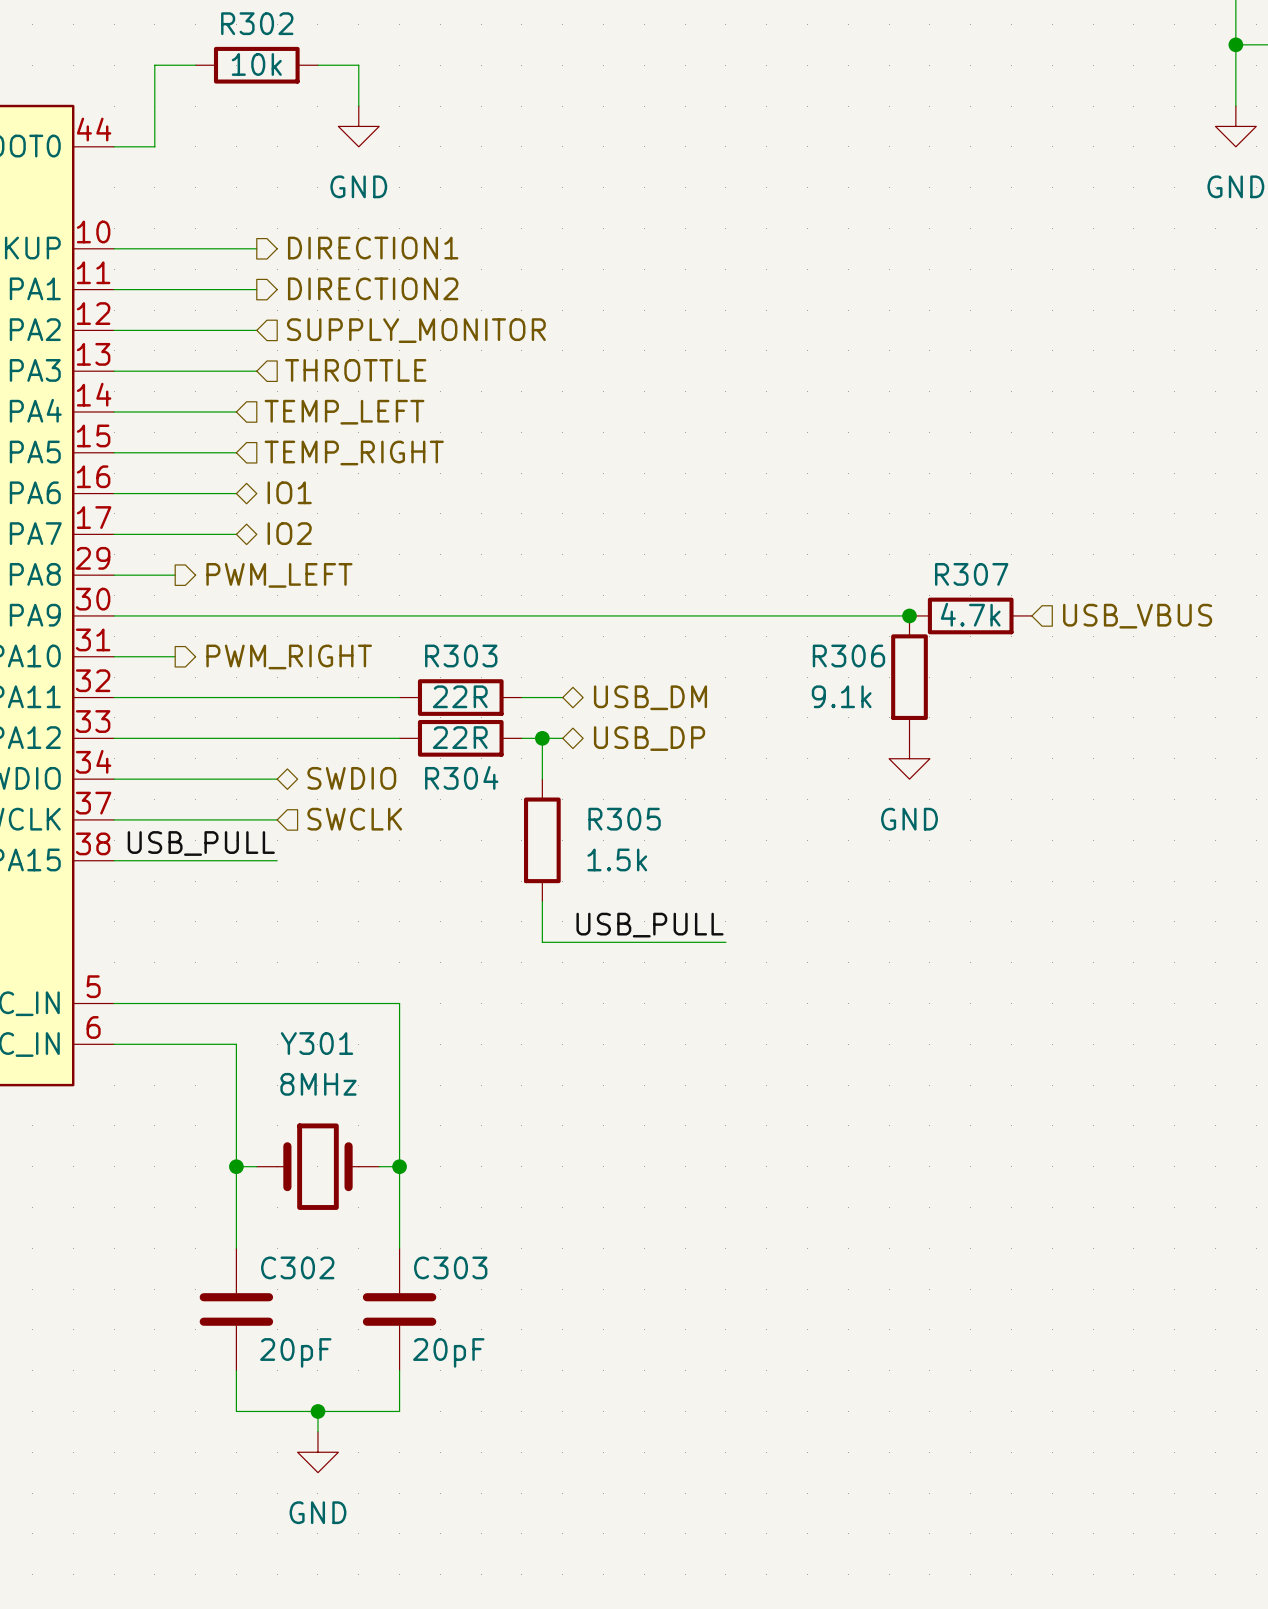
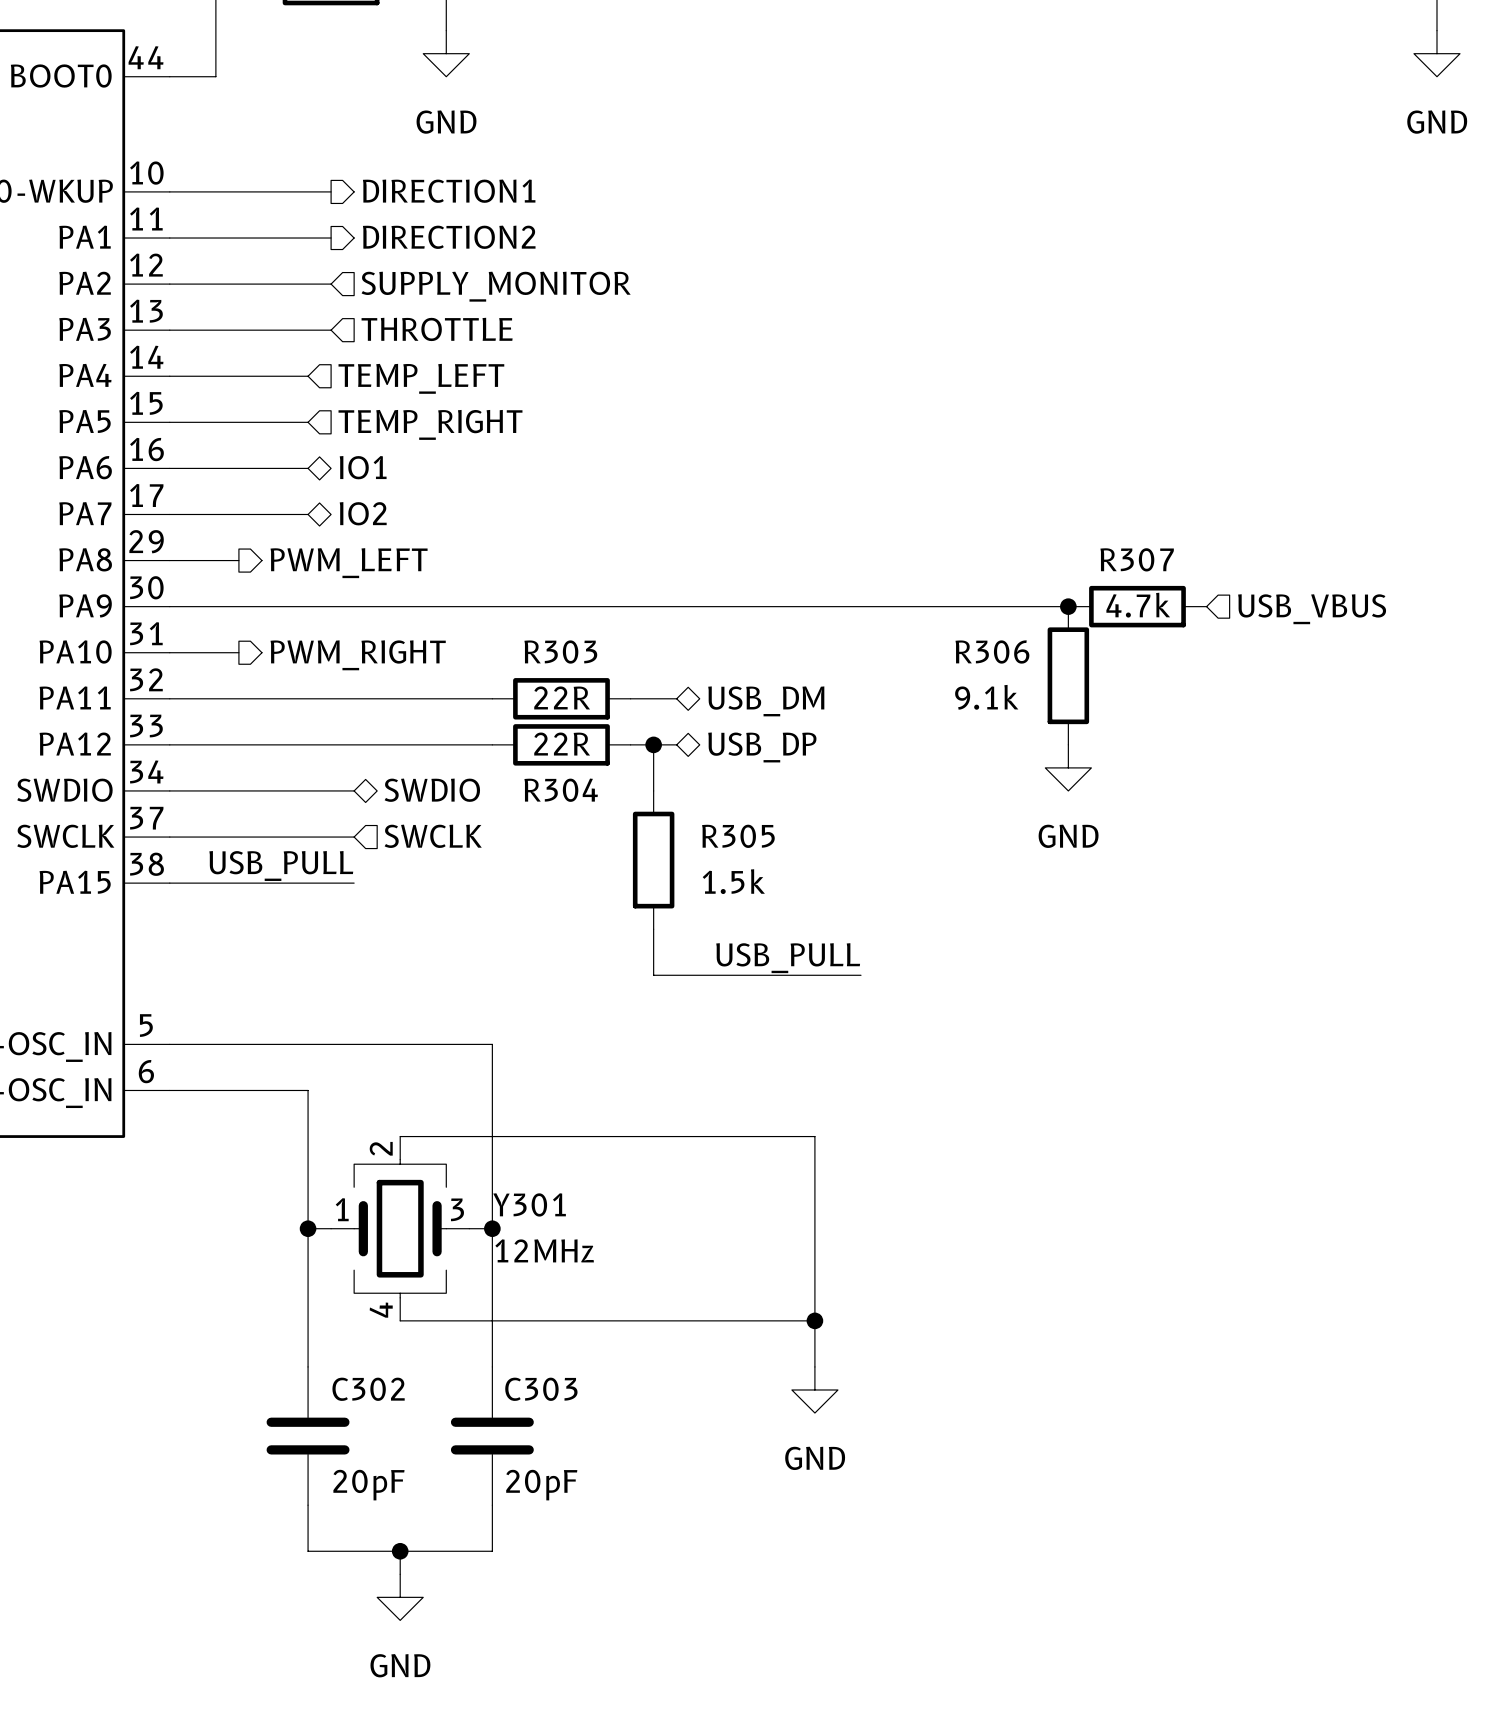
Y301 name position: Y301 (317, 1043) -> Y301 (529, 1204)
Y301 value: 8MHz (318, 1084) -> 12MHz (544, 1250)
wire: none -> (400, 1136) (814, 1136) (814, 1366)
Y301 symbol: [256, 1123, 380, 1210] -> [331, 1136, 470, 1321]
wire: none -> (400, 1320) (814, 1320)
junction: none -> (814, 1320)
C302 position: (236, 1309) -> (308, 1436)
C303 position: (399, 1309) -> (492, 1436)
power symbol: none -> GND (814, 1389)
wire: (236, 1370) (236, 1411) (399, 1411) (399, 1370) -> (308, 1505) (308, 1551) (492, 1551) (492, 1505)
wire: (317, 1411) (317, 1431) -> (400, 1551) (400, 1574)
junction position: (317, 1411) -> (400, 1551)
power symbol position: GND (317, 1452) -> GND (400, 1597)

